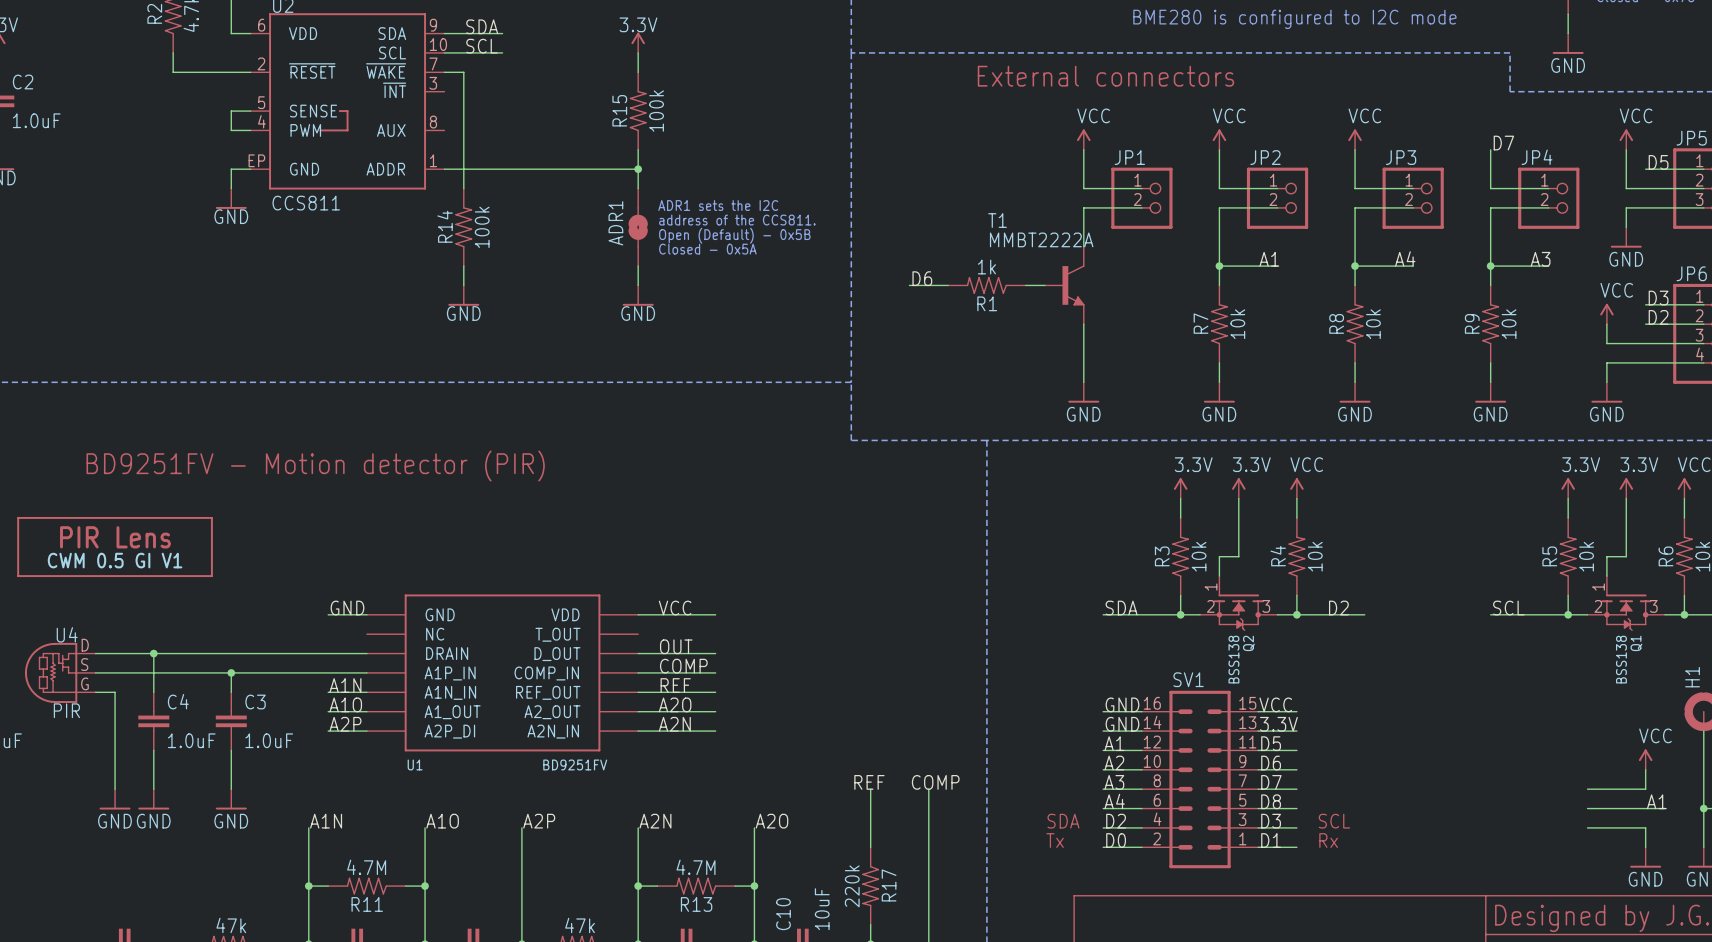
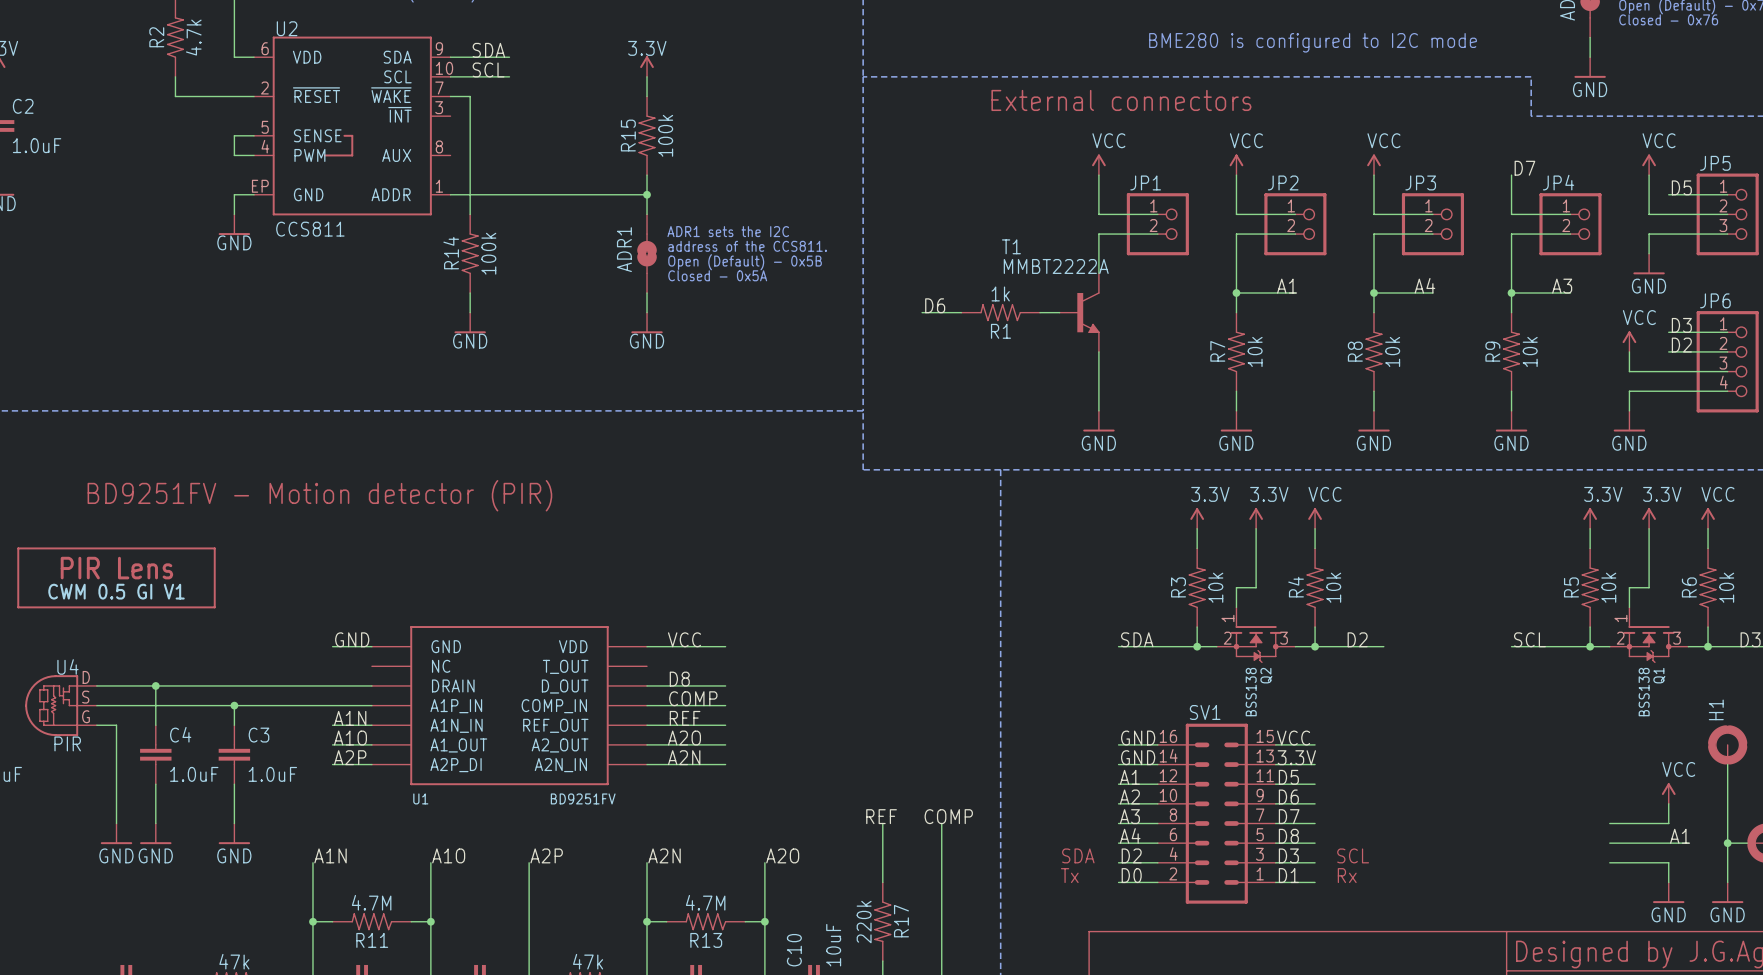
label: OUT (676, 646) -> D8 (679, 679)

